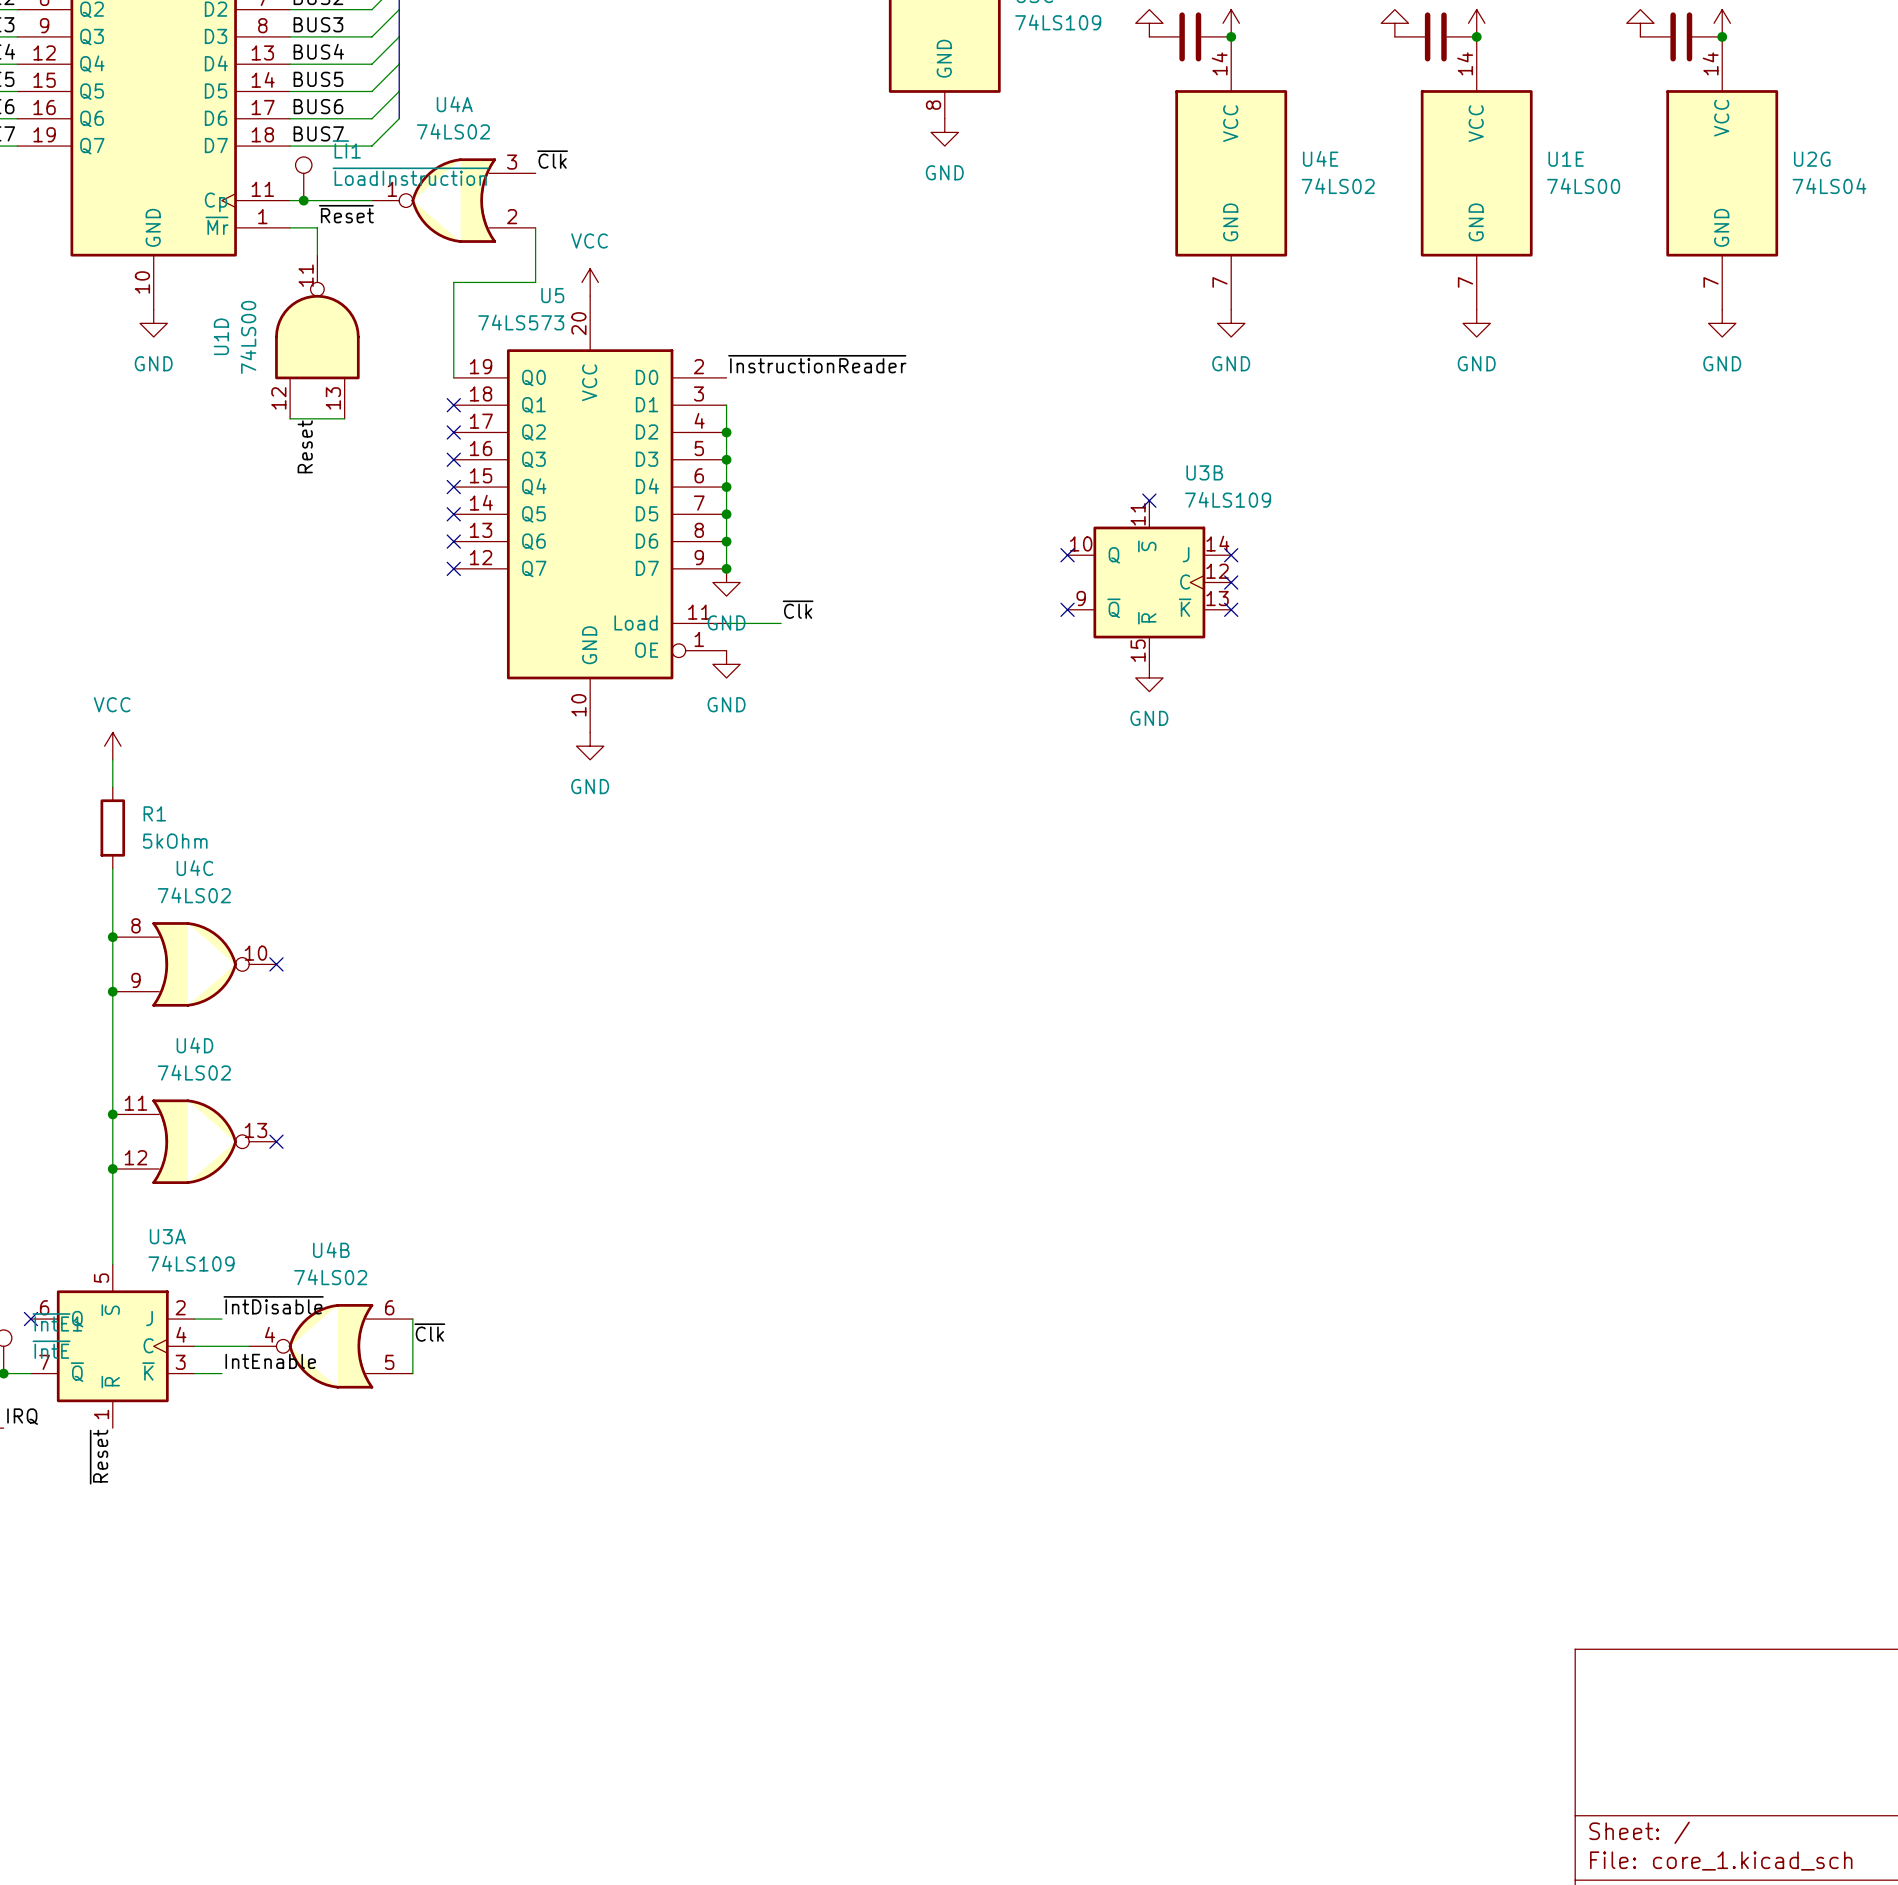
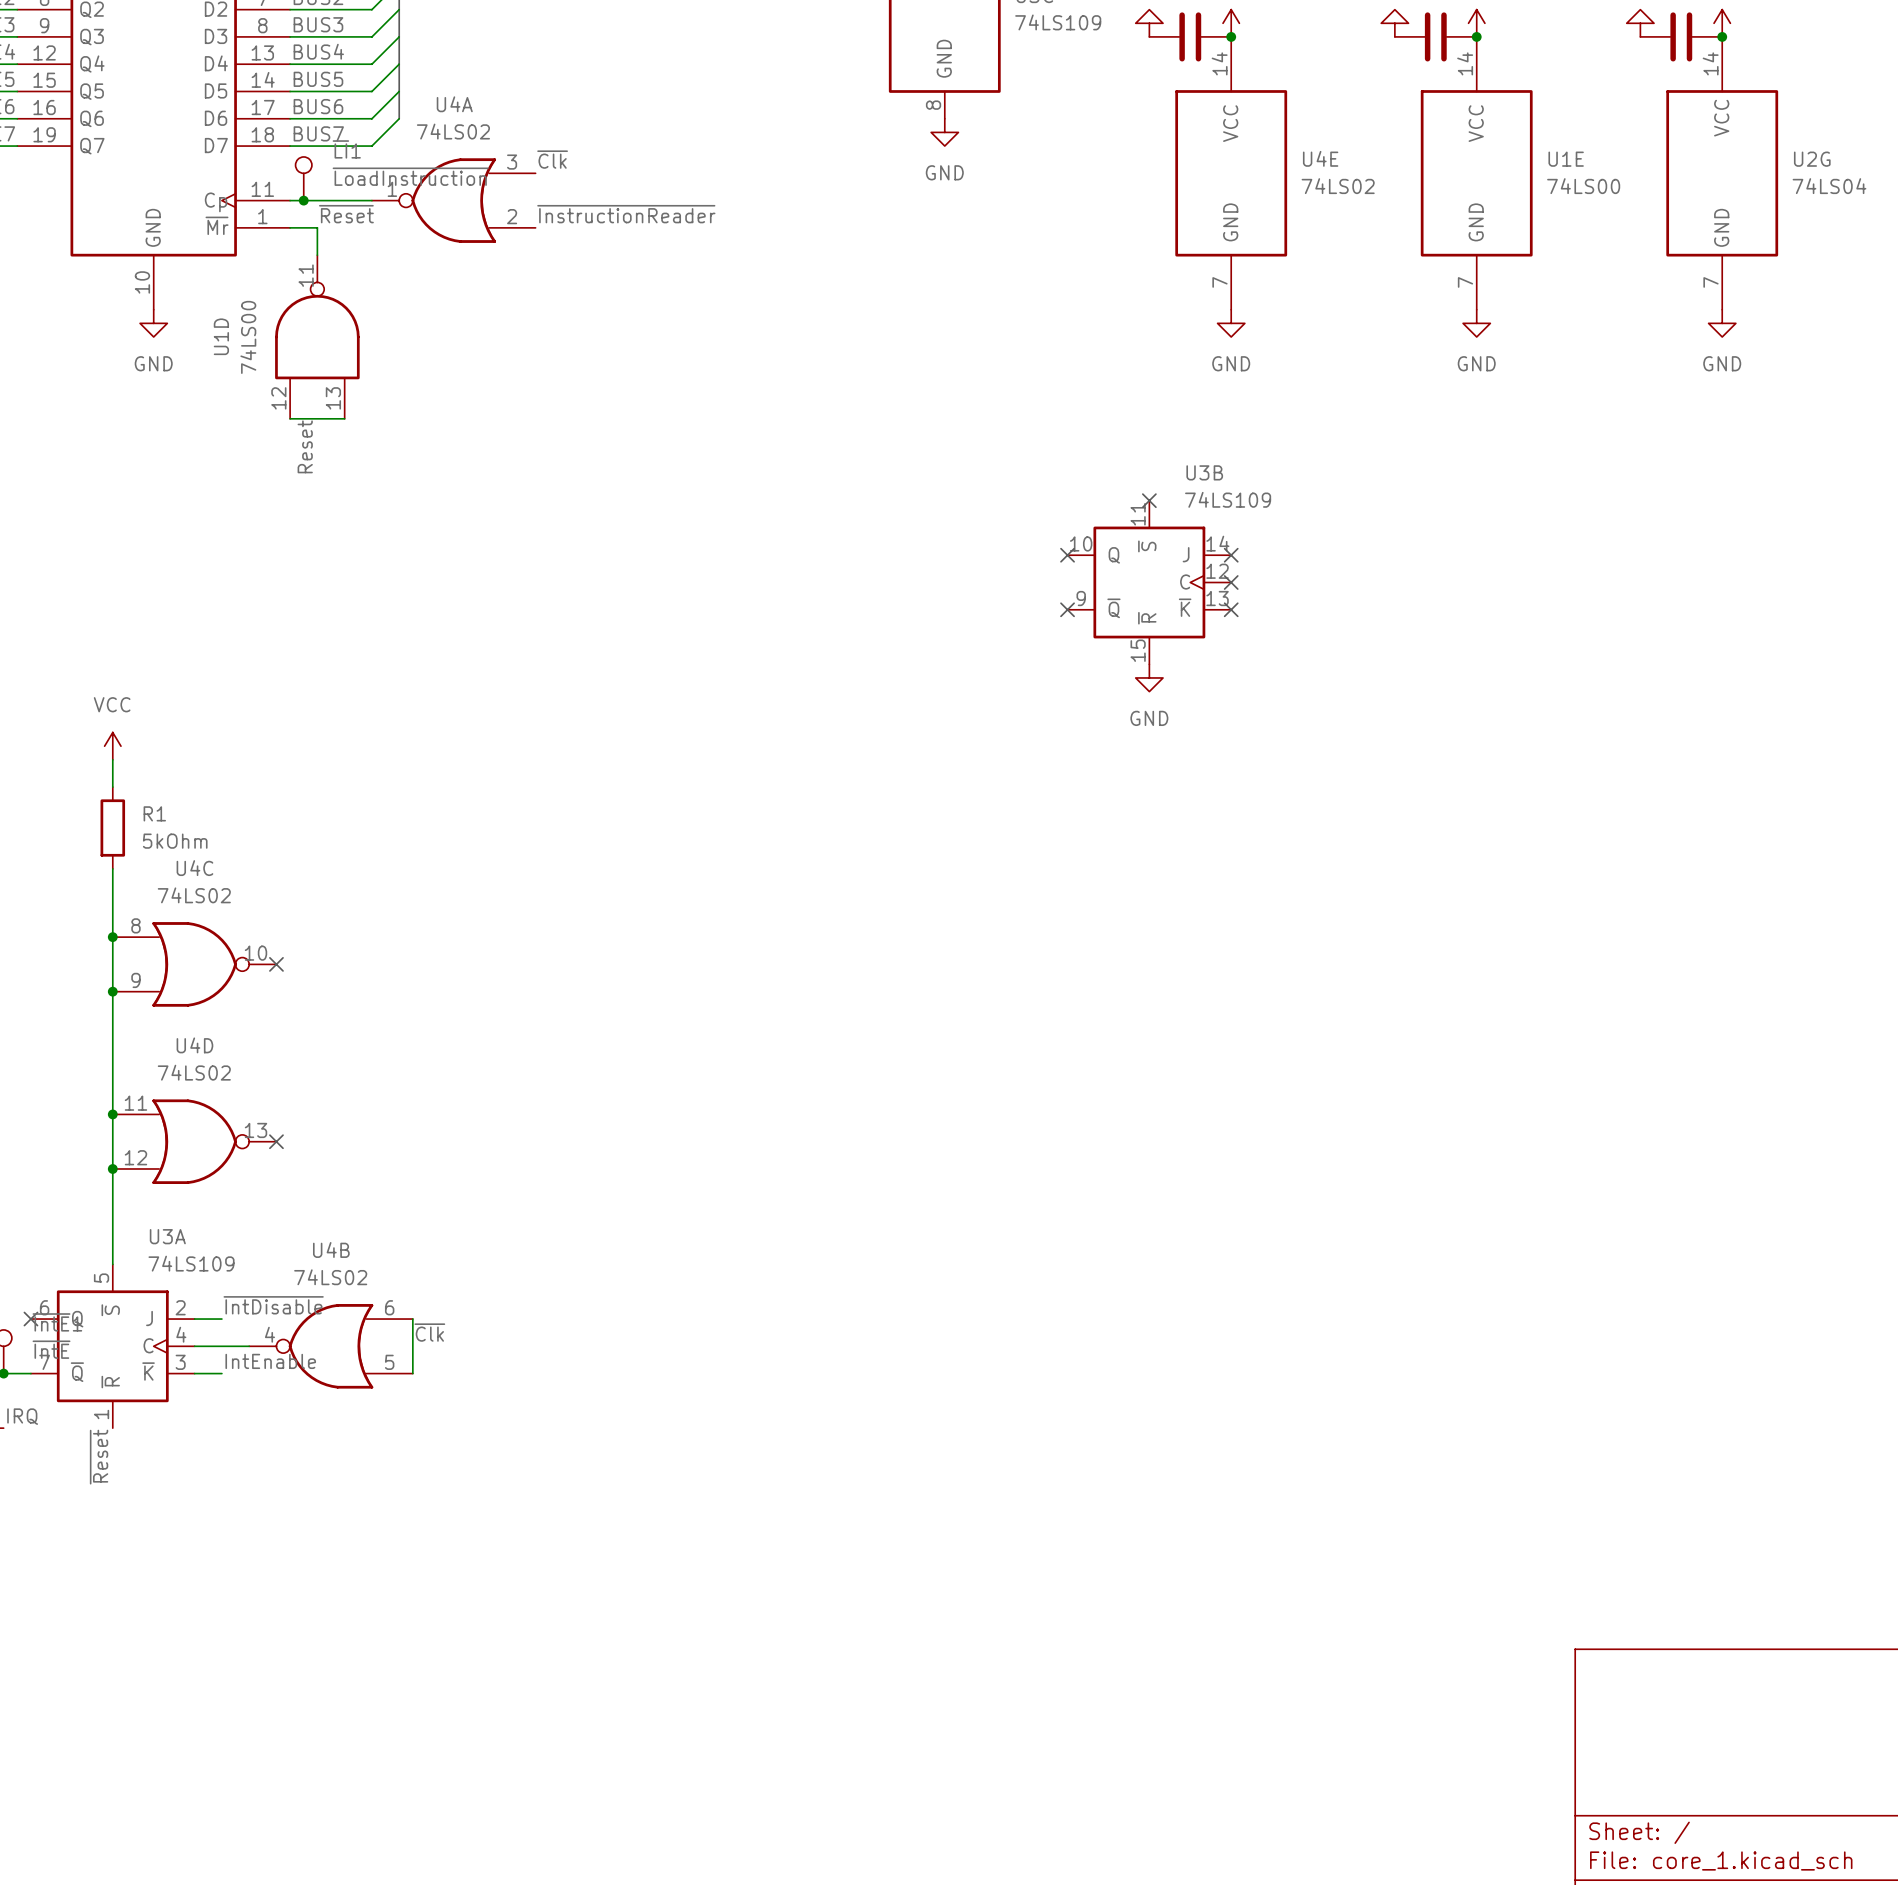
wire: (535, 227) (535, 282) (453, 282) (453, 377) -> none
power symbol: VCC (590, 282) -> none
label position: ~{InstructionReader} (817, 364) -> ~{InstructionReader} (626, 214)
no-connect mark: (453, 405) -> none
wire: (726, 405) (726, 568) -> none
no-connect mark: (453, 432) -> none
junction: (726, 432) -> none
no-connect mark: (453, 459) -> none
junction: (726, 459) -> none
no-connect mark: (453, 487) -> none
junction: (726, 487) -> none
no-connect mark: (453, 514) -> none
U5: 74LS573 (590, 514) -> none
junction: (726, 514) -> none
no-connect mark: (453, 541) -> none
junction: (726, 541) -> none
no-connect mark: (453, 568) -> none
junction: (726, 568) -> none
power symbol: GND (726, 582) -> none
label: ~{Clk} (798, 609) -> none
wire: (726, 623) (781, 623) -> none
power symbol: GND (726, 664) -> none
power symbol: GND (590, 746) -> none

